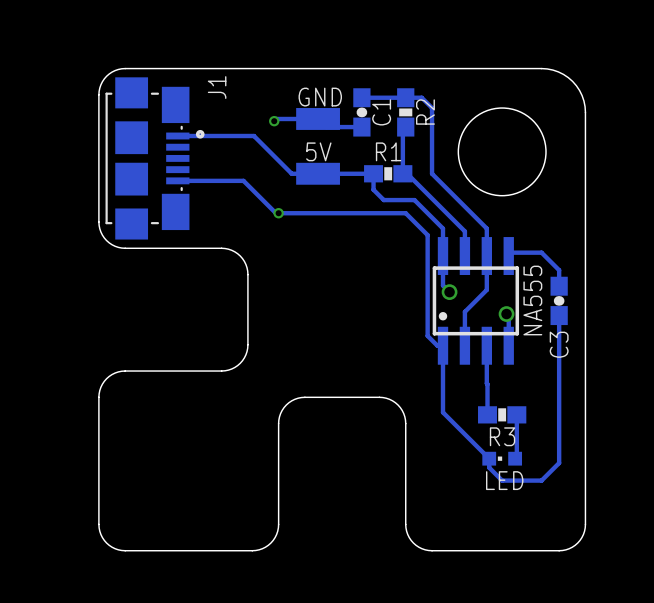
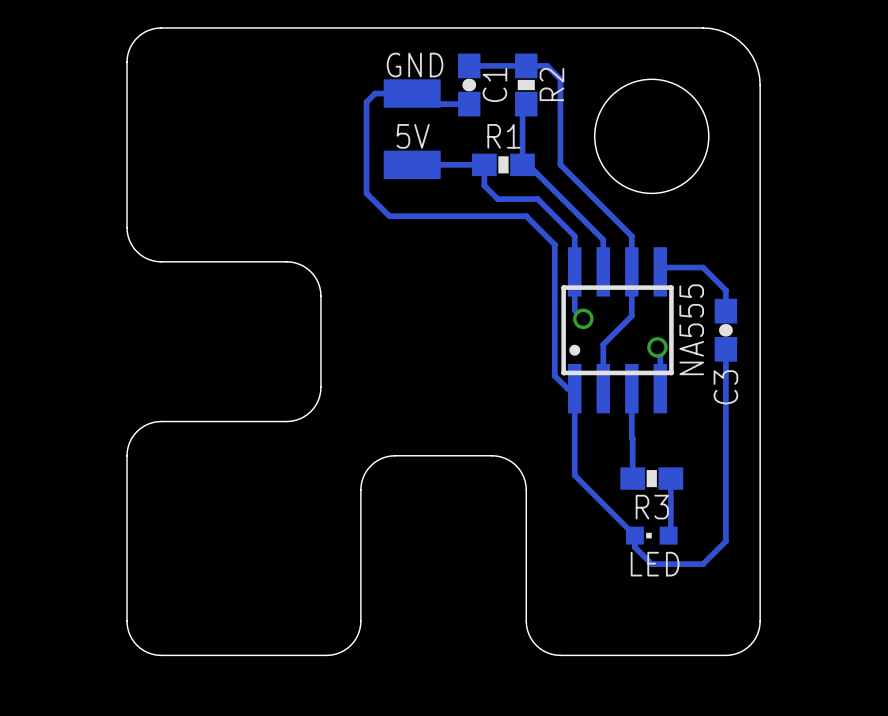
track: (289, 118) (276, 118) (274, 121) -> (375, 93) (366, 102) (366, 193) (389, 216)
via: (274, 121) -> none
track: (177, 135) (253, 135) (291, 173) (313, 173) -> none
J1: (155, 158) -> none
track: (177, 180) (243, 180) (275, 213) (300, 213) -> none
via: (278, 213) -> none

